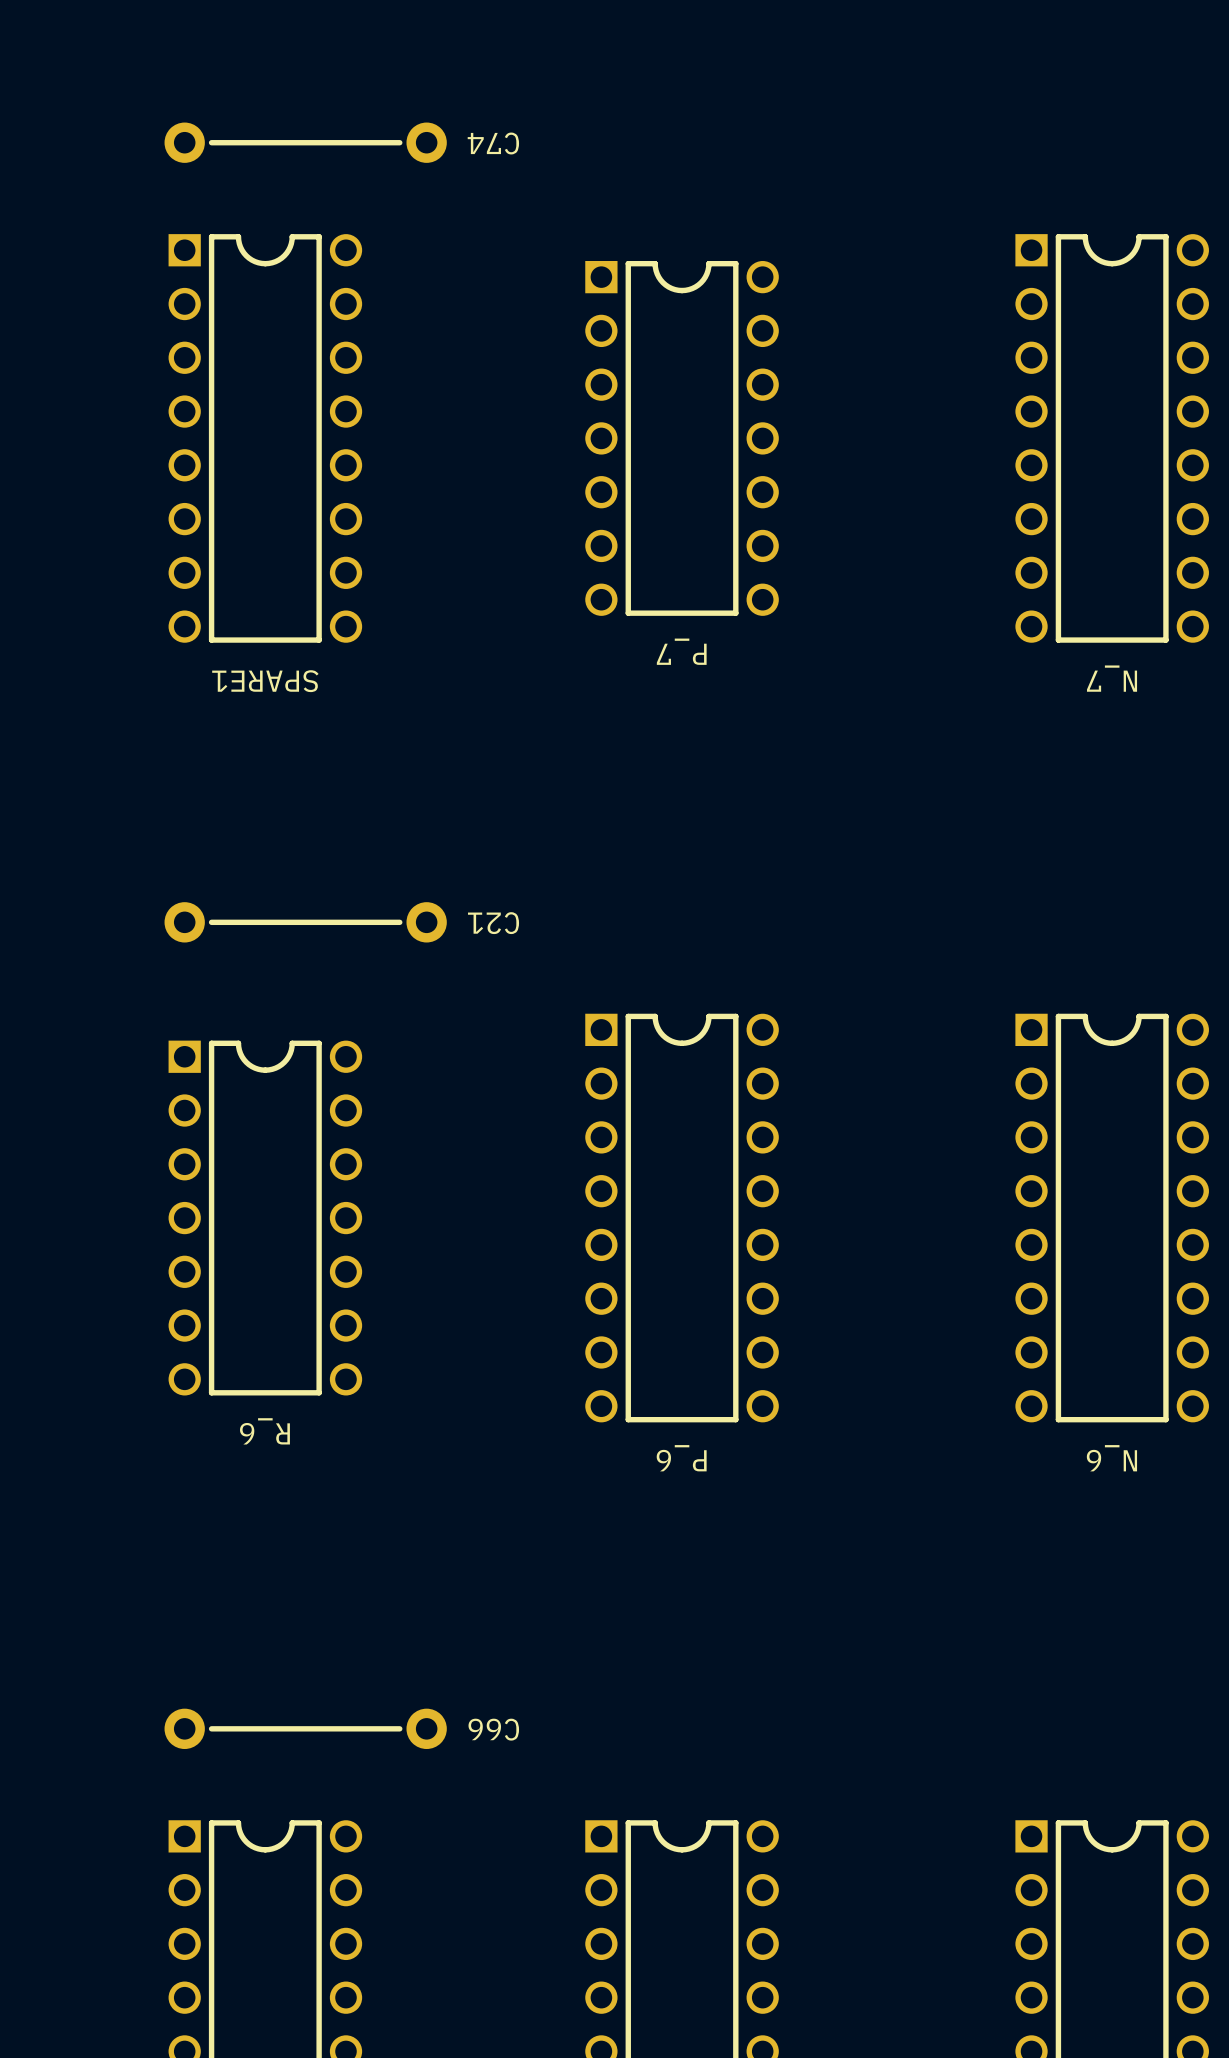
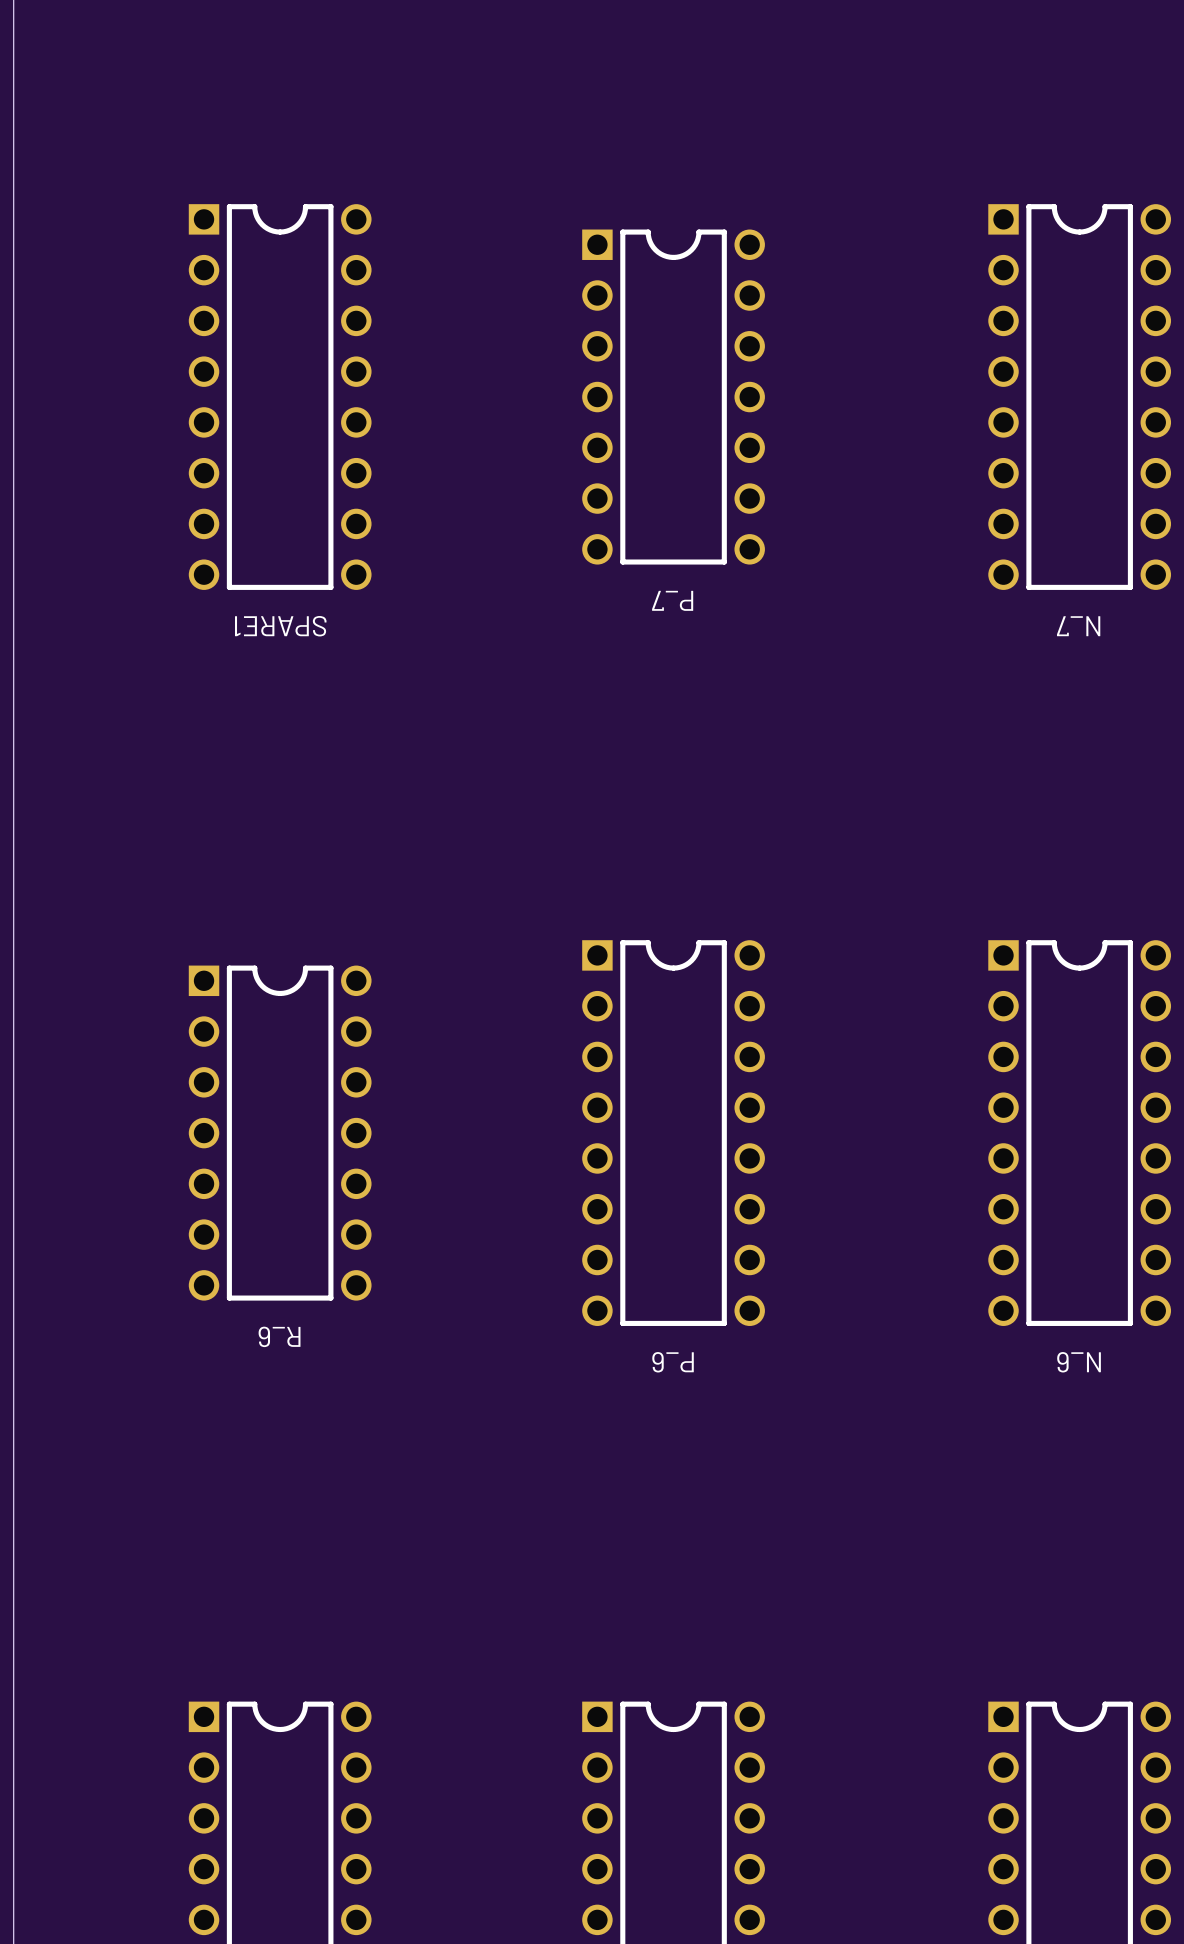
C74: (305, 142) -> none
C21: (305, 922) -> none
C66: (305, 1728) -> none

